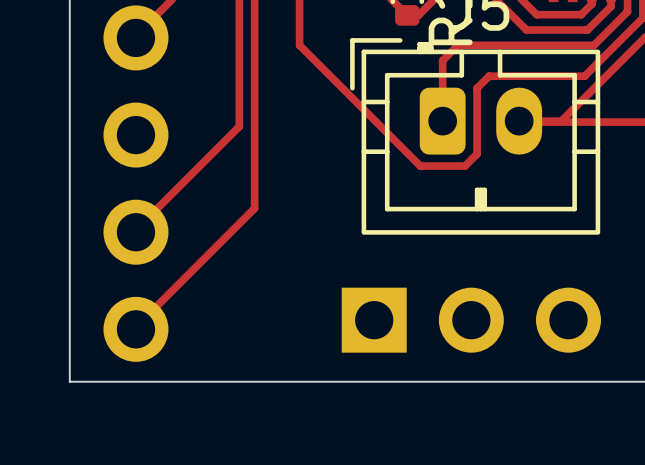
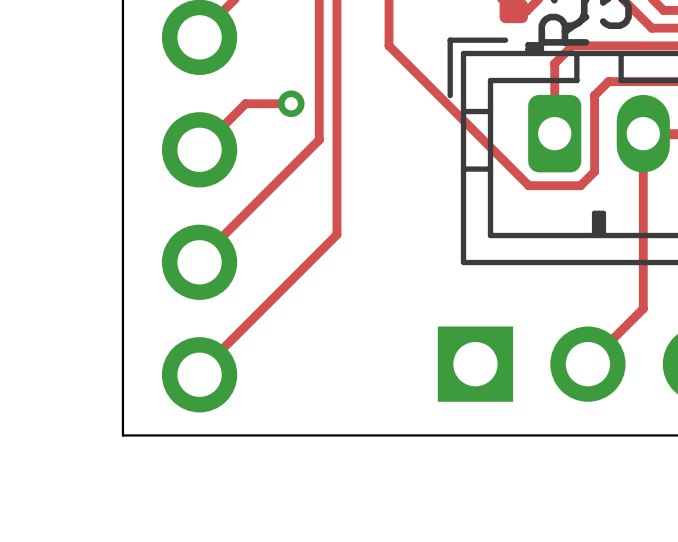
track: none -> (291, 103) (245, 103) (199, 149)
via: none -> (291, 103)
track: none -> (643, 133) (643, 308) (587, 364)

